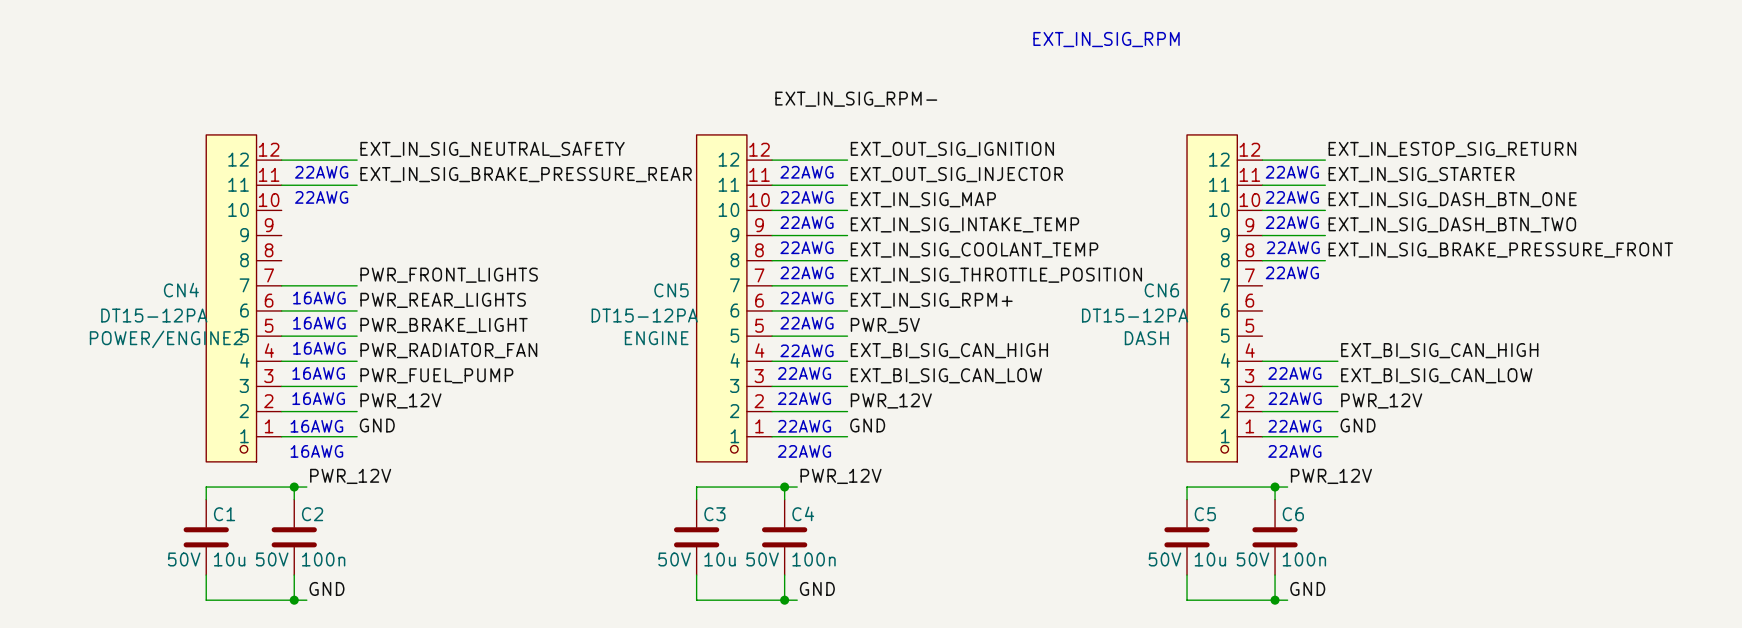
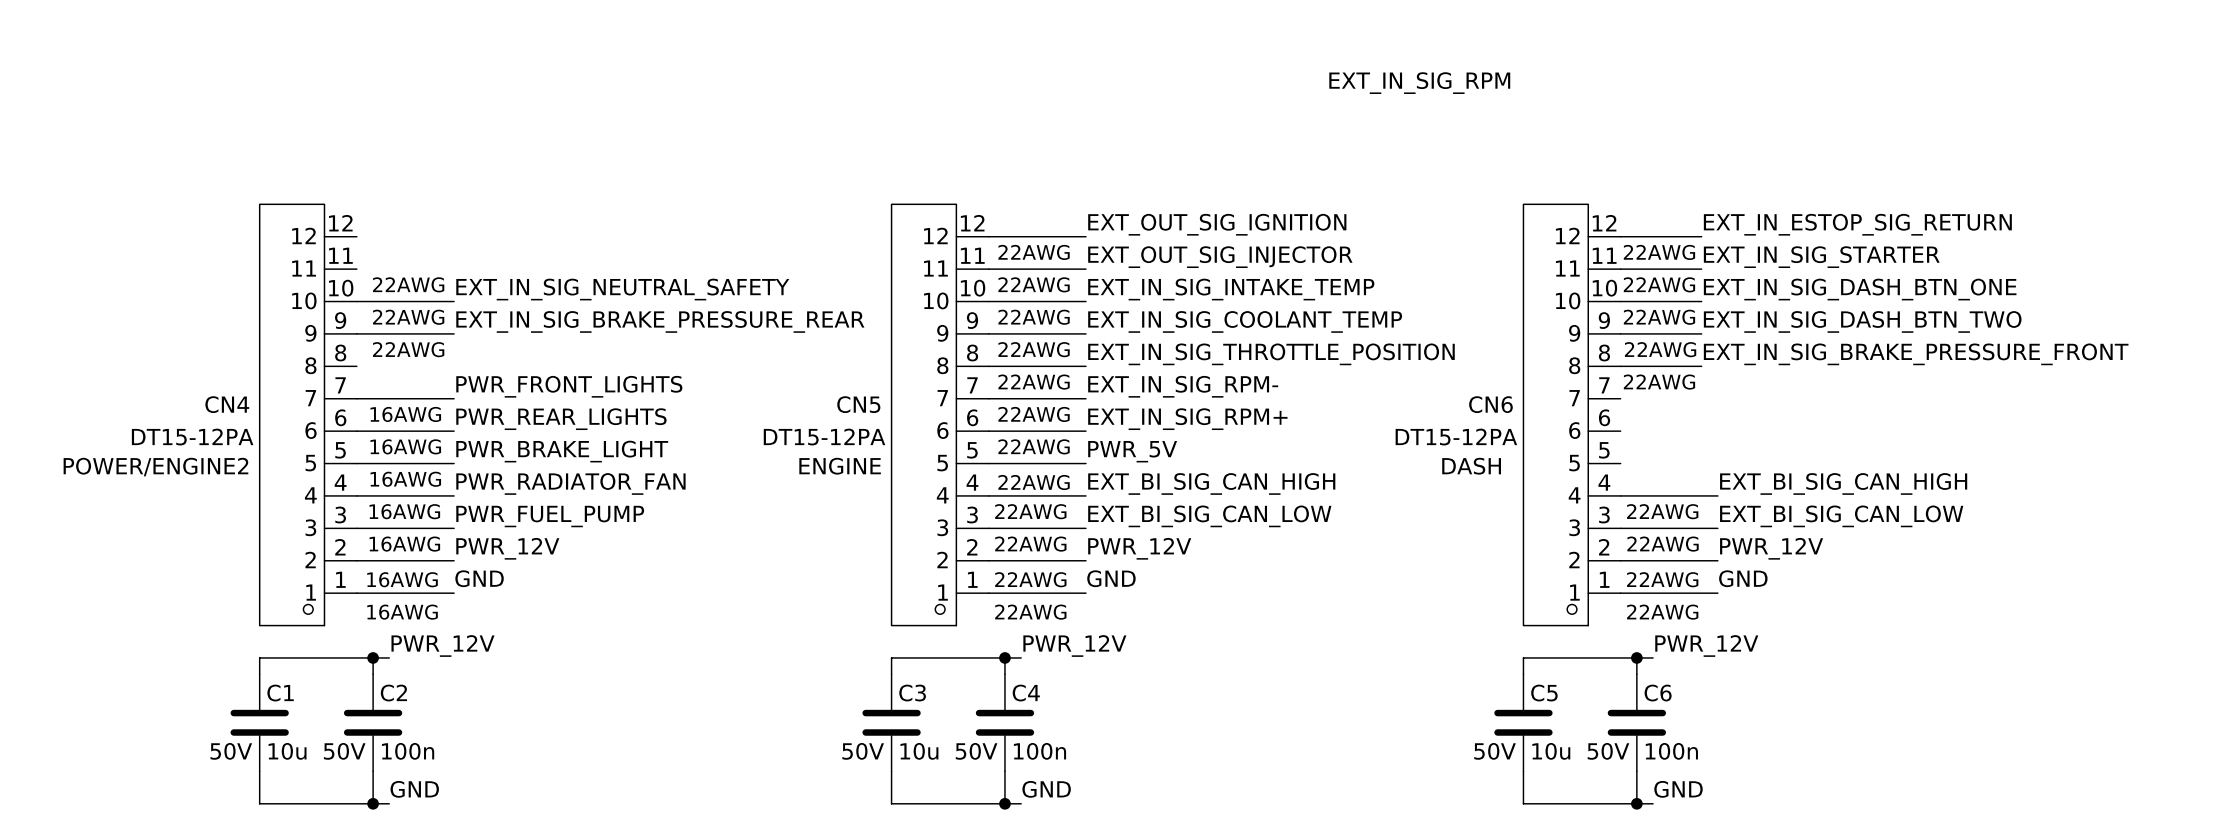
label: EXT_IN_SIG_RPM- (856, 99) -> none
label position: EXT_IN_SIG_NEUTRAL_SAFETY (492, 149) -> EXT_IN_SIG_NEUTRAL_SAFETY (622, 289)
wire: (281, 160) (357, 160) -> (356, 301) (454, 301)
text: 22AWG (321, 172) -> none
label position: EXT_IN_SIG_BRAKE_PRESSURE_REAR (526, 174) -> EXT_IN_SIG_BRAKE_PRESSURE_REAR (660, 321)
wire: (281, 185) (357, 185) -> (356, 333) (454, 333)
label: EXT_IN_SIG_MAP (923, 199) -> EXT_IN_SIG_INTAKE_TEMP (1231, 289)
text: none -> 22AWG (408, 317)
label: EXT_IN_SIG_INTAKE_TEMP (964, 224) -> EXT_IN_SIG_COOLANT_TEMP (1245, 321)
text: none -> 22AWG (408, 349)
label: EXT_IN_SIG_COOLANT_TEMP (974, 250) -> EXT_IN_SIG_THROTTLE_POSITION (1271, 354)
label: EXT_IN_SIG_THROTTLE_POSITION (996, 275) -> EXT_IN_SIG_RPM- (1183, 386)
CN4 text position: POWER/ENGINE2 (166, 339) -> POWER/ENGINE2 (155, 467)

